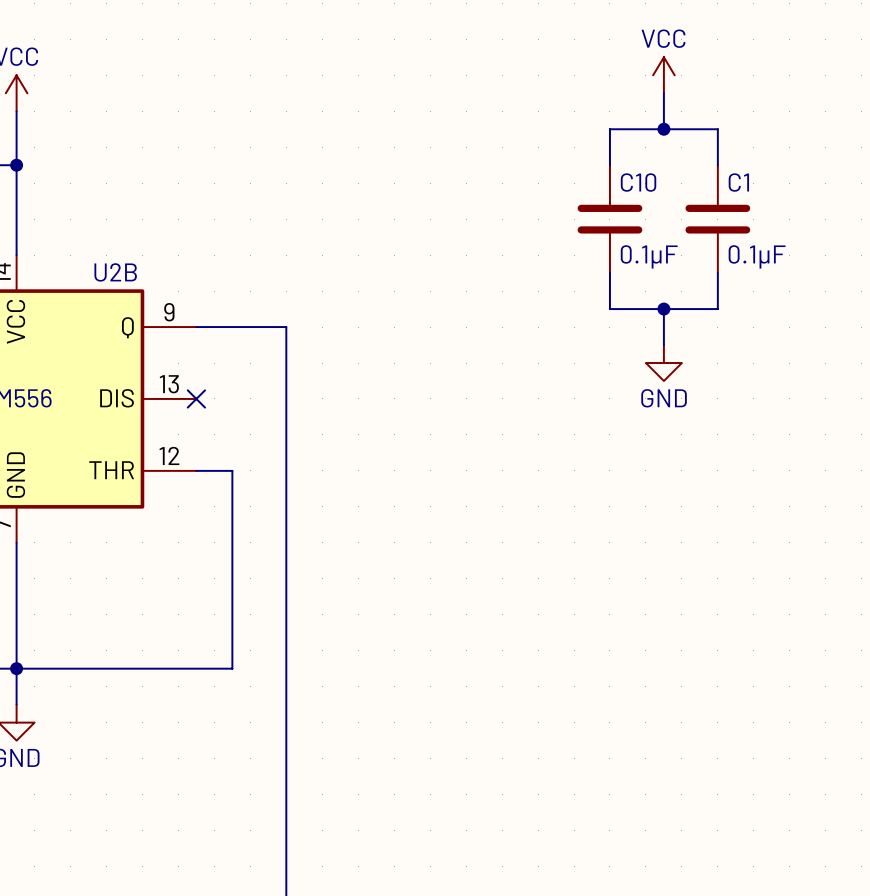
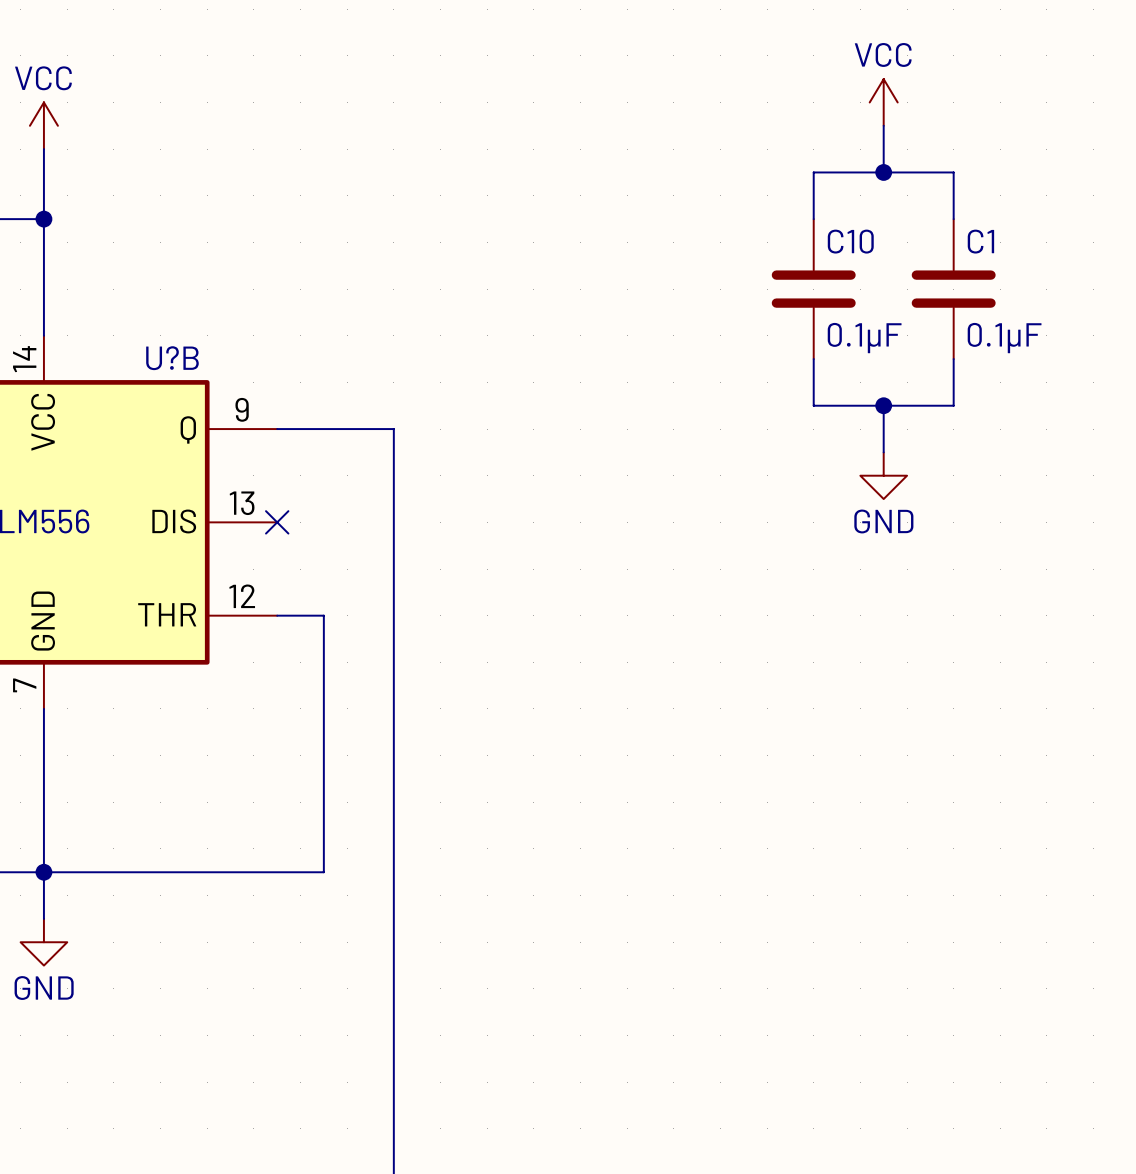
U2B name: U2B (115, 272) -> U?B (172, 358)

